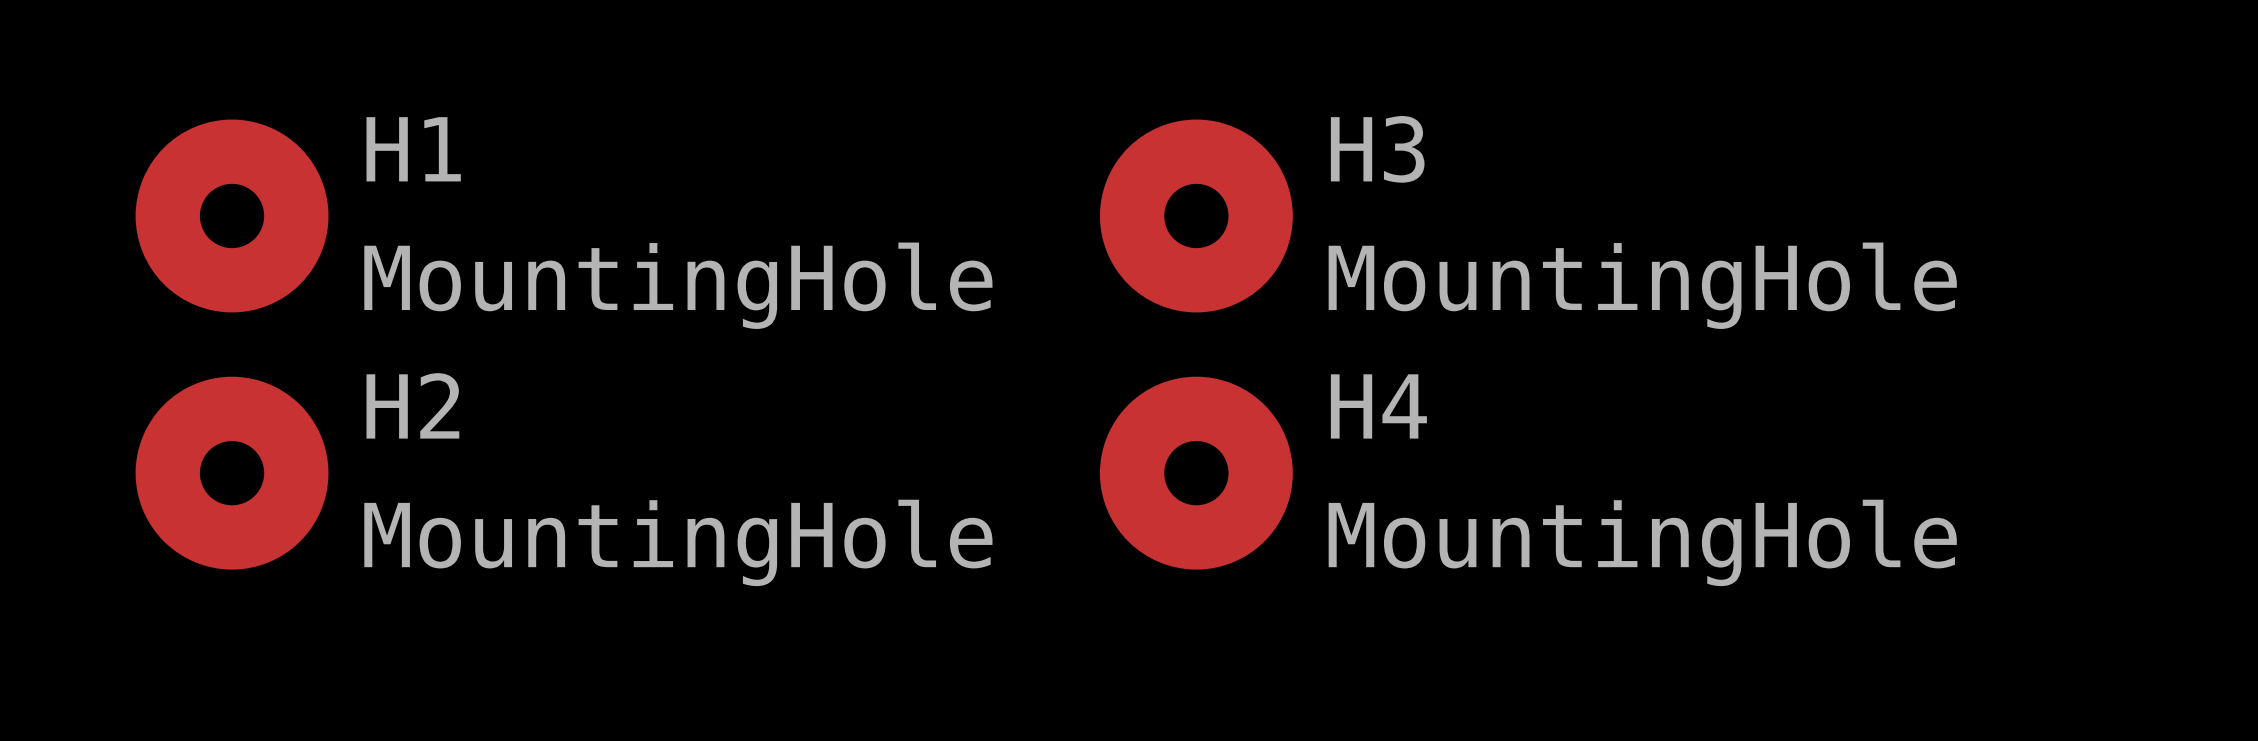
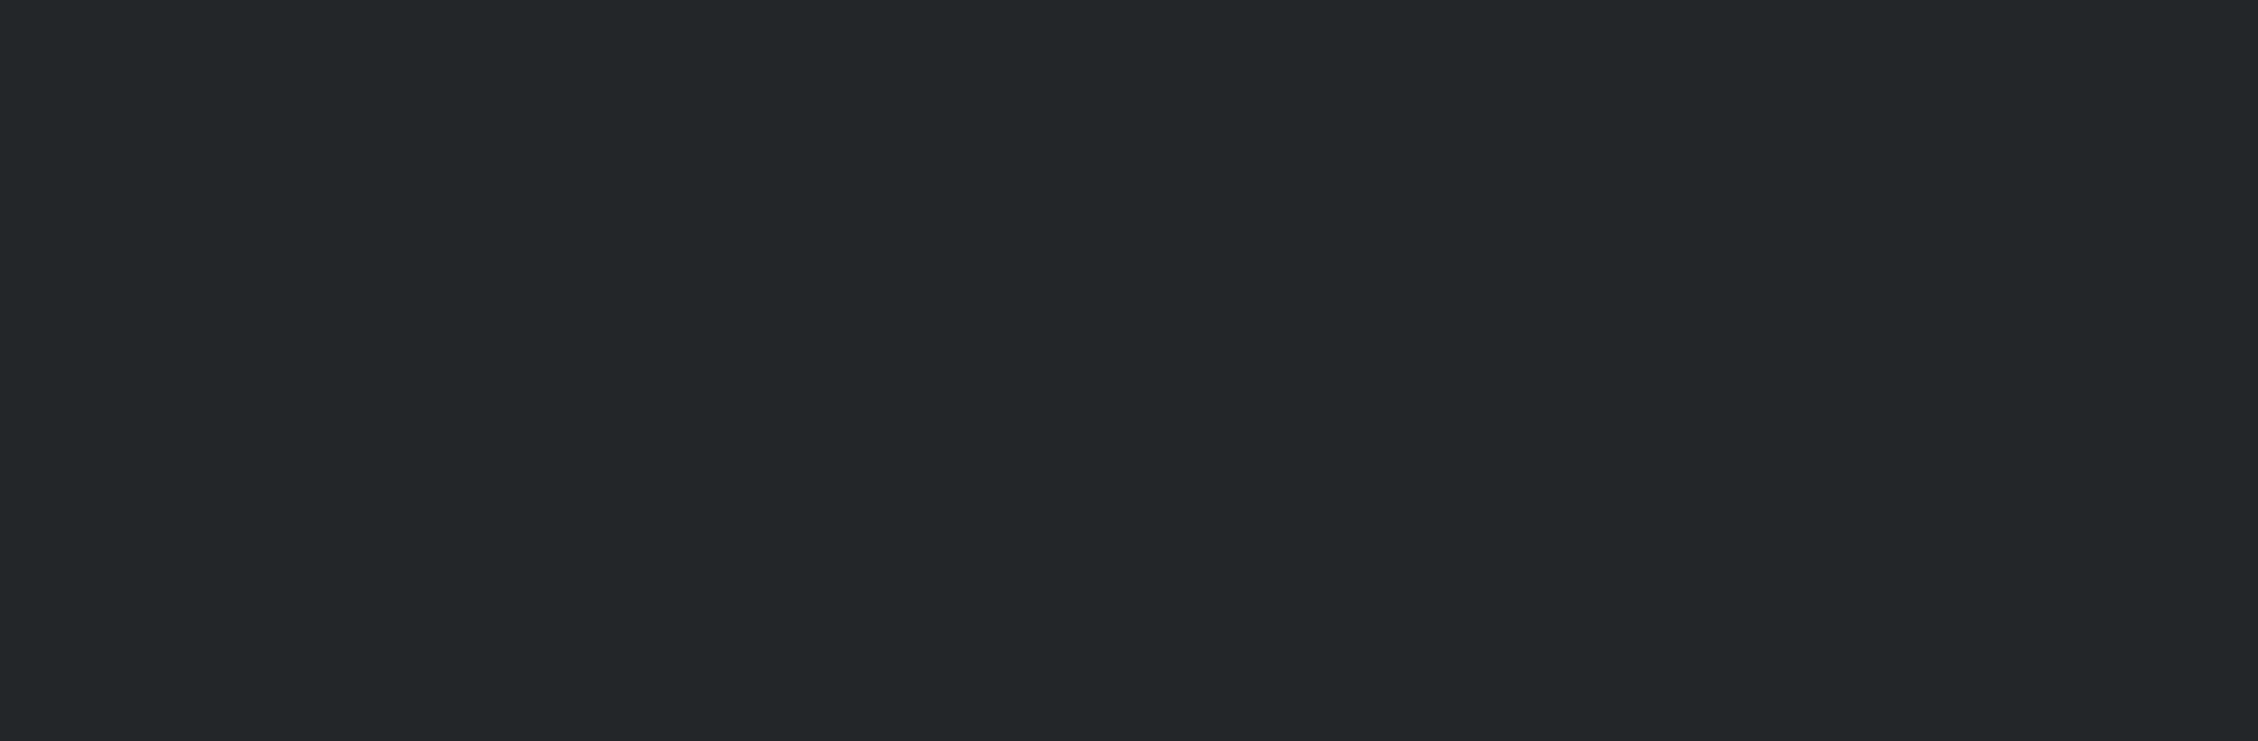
H1: MountingHole (232, 215) -> none
H3: MountingHole (1196, 215) -> none
H2: MountingHole (232, 473) -> none
H4: MountingHole (1196, 473) -> none

